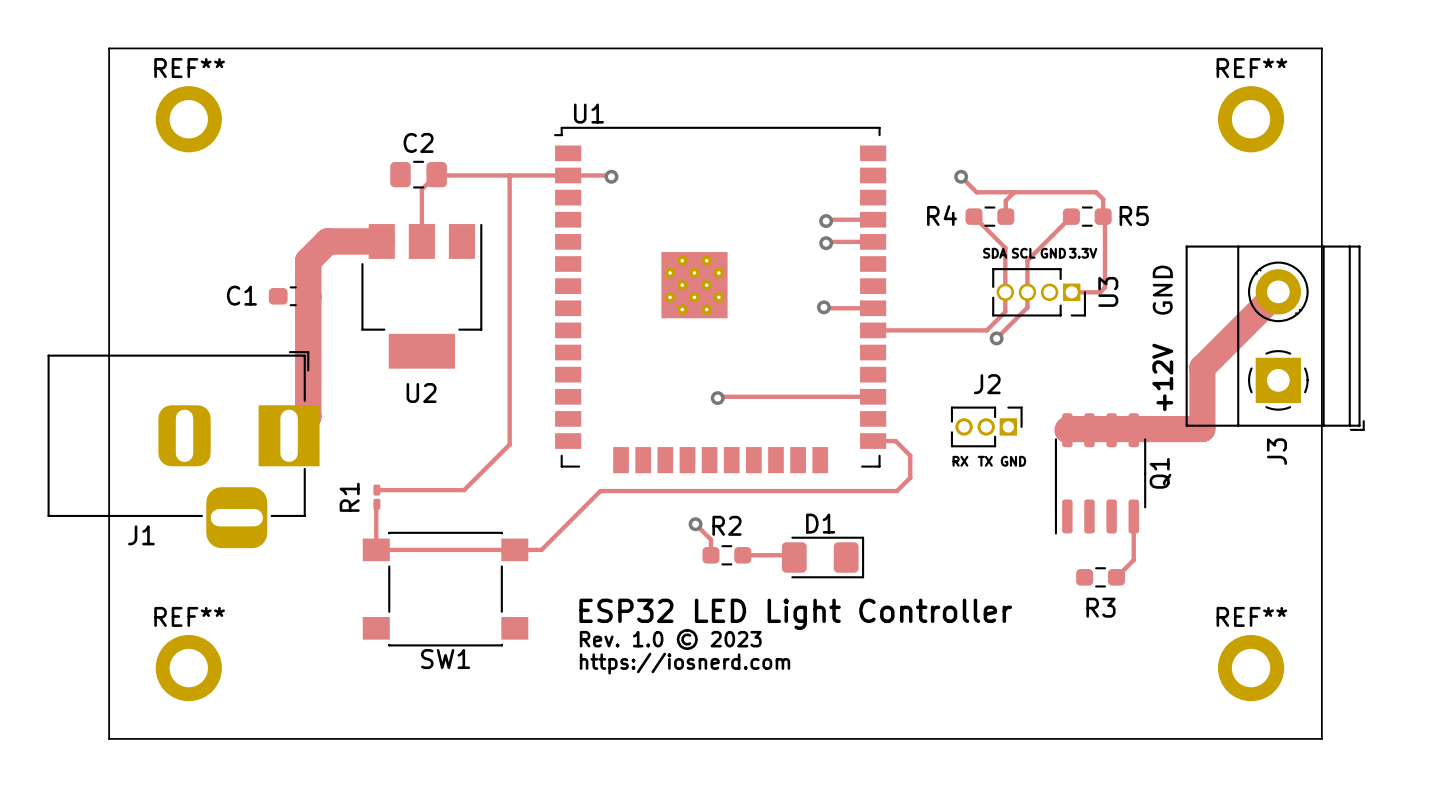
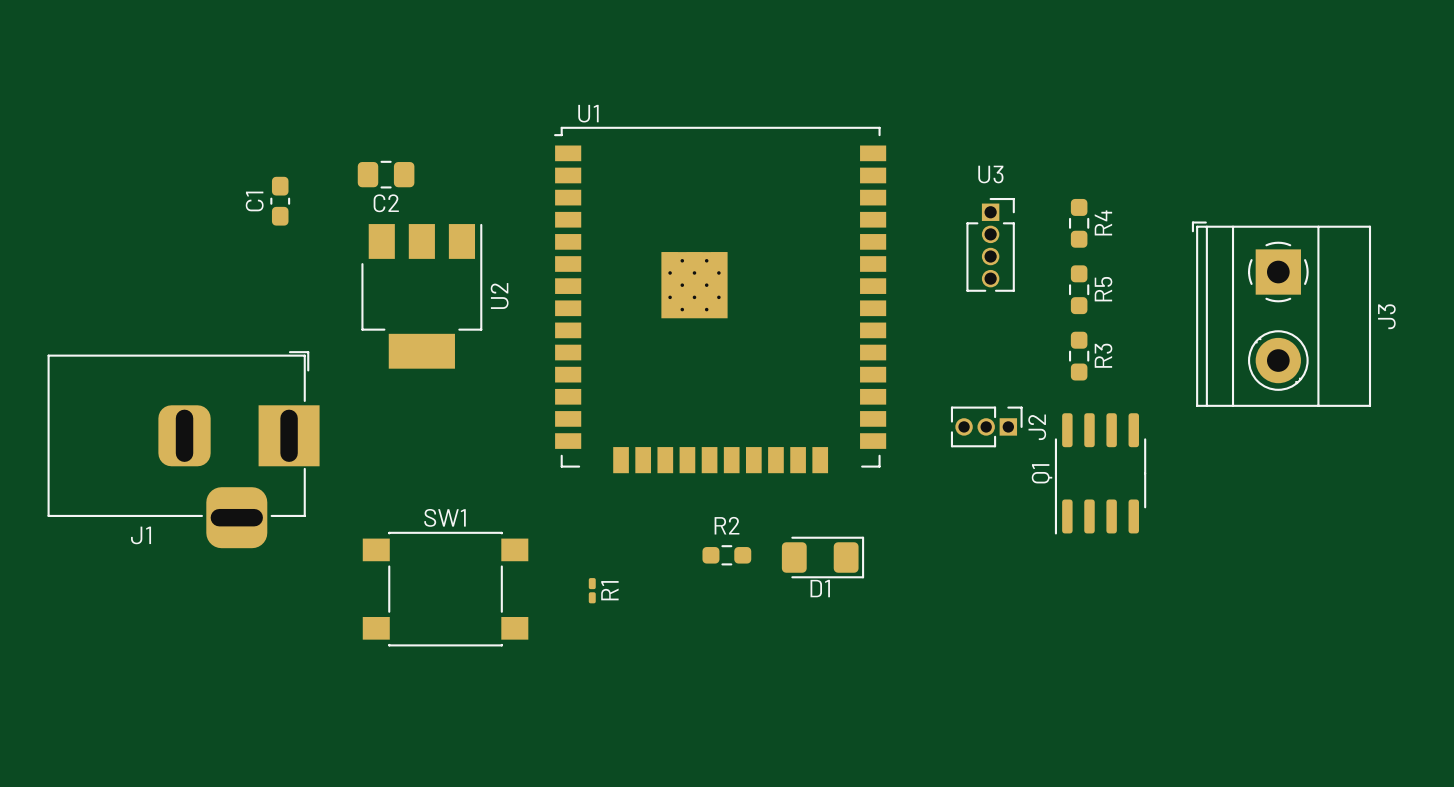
board edge: (109, 48) (1321, 48) (1321, 738) (109, 738) (109, 48) -> none
REF**: (188, 119) -> none
REF**: (1251, 119) -> none
C2 name position: C2 (418, 142) -> C2 (386, 203)
C2 position: (418, 174) -> (386, 174)
track: (509, 175) (509, 444) (464, 490) (376, 490) -> none
track: (611, 176) (436, 174) (421, 189) (421, 241) -> none
via: (611, 176) -> none
track: (961, 176) (976, 192) (1096, 192) (1103, 199) (1104, 287) (1100, 292) (1071, 292) -> none
via: (961, 176) -> none
track: (1014, 192) (1005, 200) (1005, 216) -> none
R4 name position: R4 (942, 215) -> R4 (1103, 222)
track: (974, 216) (1005, 247) (1005, 311) (986, 330) (873, 330) -> none
R4 rotation: 0° (989, 216) -> 90° clockwise (1079, 223)
R4 position: (989, 216) -> (1079, 223)
track: (1071, 216) (1027, 260) (1027, 307) (996, 338) -> none
R5 rotation: 0° (1087, 216) -> 90° clockwise (1079, 289)
R5 position: (1087, 216) -> (1079, 289)
track: (873, 219) (826, 221) -> none
via: (826, 221) -> none
track: (381, 241) (327, 241) (308, 260) (308, 416) (289, 435) -> none
track: (873, 241) (826, 243) -> none
via: (826, 243) -> none
text: SDA (995, 253) -> none
text: SCL (1023, 253) -> none
text: GND (1053, 253) -> none
text: 3.3V (1083, 253) -> none
text: GND (1162, 290) -> none
track: (1278, 291) (1202, 367) (1202, 429) (1067, 430) (1133, 430) -> none
U3 rotation: 0° (1039, 292) -> 90° counterclockwise (990, 244)
U3 position: (1039, 292) -> (990, 244)
C1 rotation: 0° (293, 296) -> 90° clockwise (280, 201)
C1 position: (293, 296) -> (280, 201)
track: (823, 307) (873, 308) -> none
via: (823, 307) -> none
via: (996, 338) -> none
J3 rotation: 0° (1275, 338) -> 180° (1281, 314)
text: +12V (1162, 377) -> none
J2 name rotation: 0° (987, 384) -> 90° counterclockwise (1037, 427)
J2 name position: J2 (987, 384) -> J2 (1037, 427)
U2 name rotation: 0° (421, 393) -> 90° counterclockwise (499, 296)
U2 name position: U2 (421, 393) -> U2 (499, 296)
track: (873, 396) (717, 398) -> none
via: (717, 398) -> none
track: (873, 441) (895, 441) (910, 455) (910, 477) (896, 491) (600, 491) (541, 549) (376, 549) (376, 504) -> none
J3 name position: J3 (1276, 451) -> J3 (1386, 316)
text: RX (960, 461) -> none
text: TX (985, 461) -> none
text: GND (1013, 461) -> none
Q1 name position: Q1 (1160, 473) -> Q1 (1042, 473)
R1 name position: R1 (349, 497) -> R1 (609, 590)
R1 position: (376, 497) -> (592, 590)
track: (1133, 516) (1133, 560) (1116, 577) -> none
D1 name position: D1 (820, 523) -> D1 (820, 588)
track: (695, 524) (710, 539) (710, 555) -> none
via: (695, 524) -> none
track: (742, 555) (792, 555) (794, 557) -> none
R3 rotation: 0° (1100, 577) -> 90° clockwise (1079, 356)
R3 position: (1100, 577) -> (1079, 356)
R3 name position: R3 (1100, 607) -> R3 (1103, 355)
text: ESP32 LED Light Controller (795, 614) -> none
text: Rev. 1.0 © 2023 (670, 639) -> none
SW1 name position: SW1 (445, 659) -> SW1 (445, 517)
text: https://iosnerd.com (684, 663) -> none
REF**: (188, 668) -> none
REF**: (1251, 668) -> none

